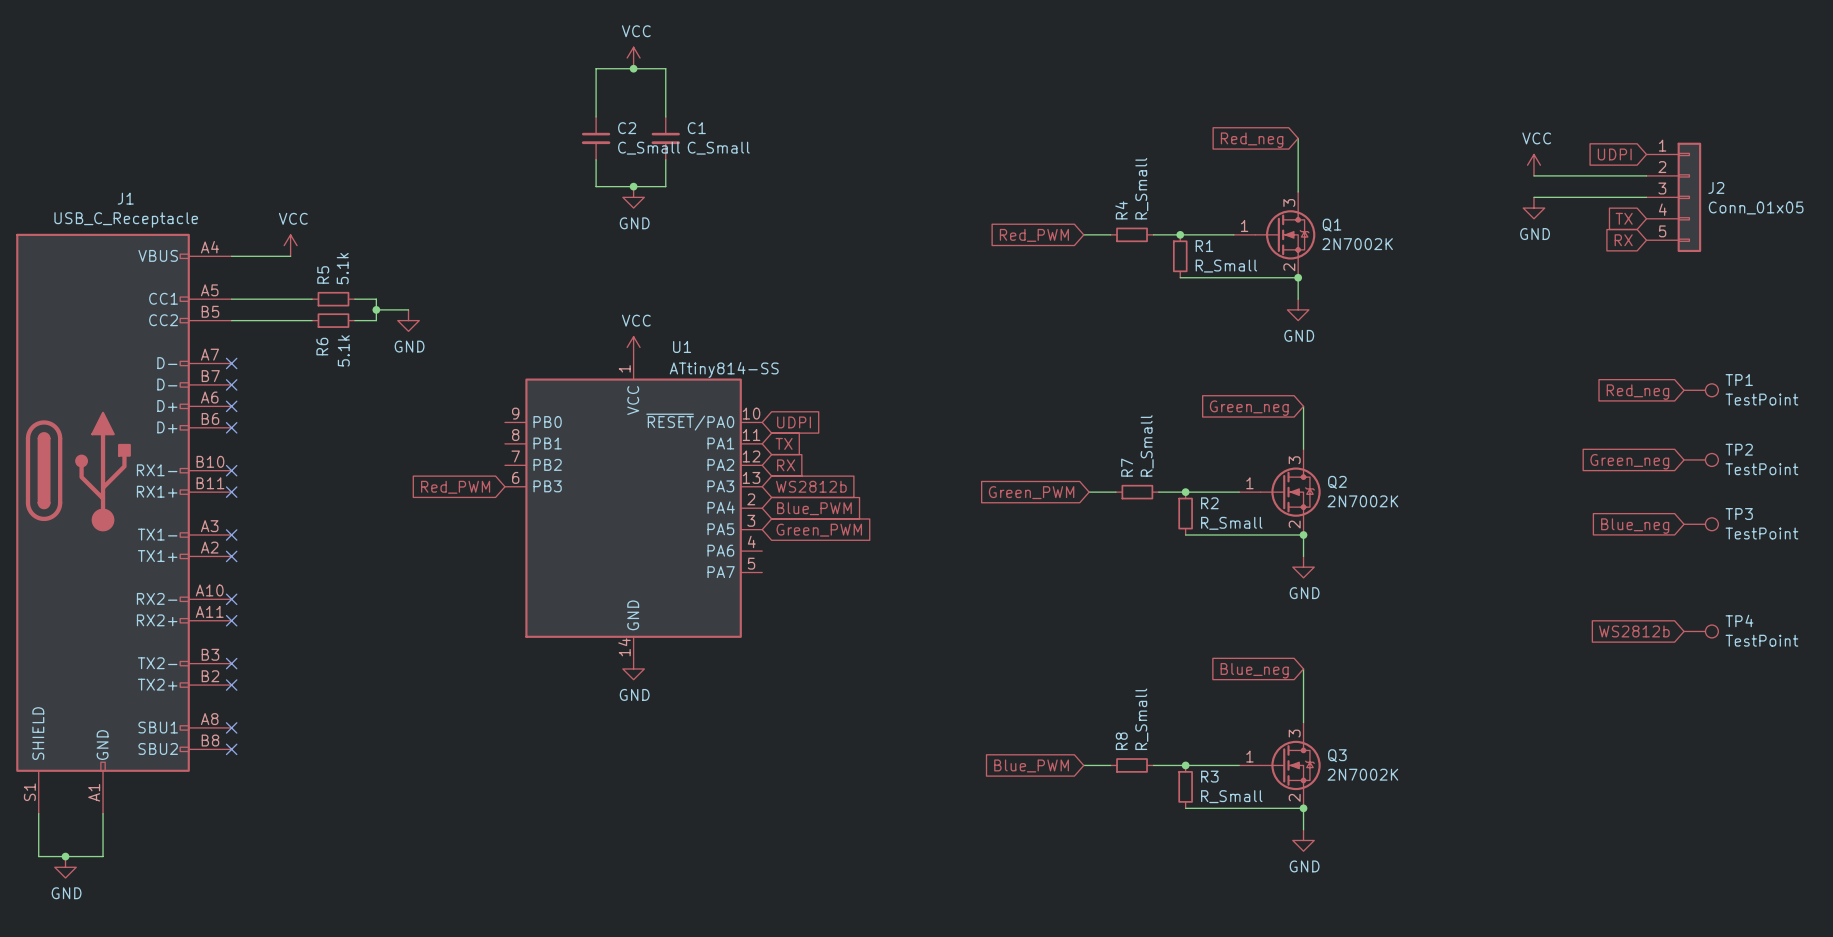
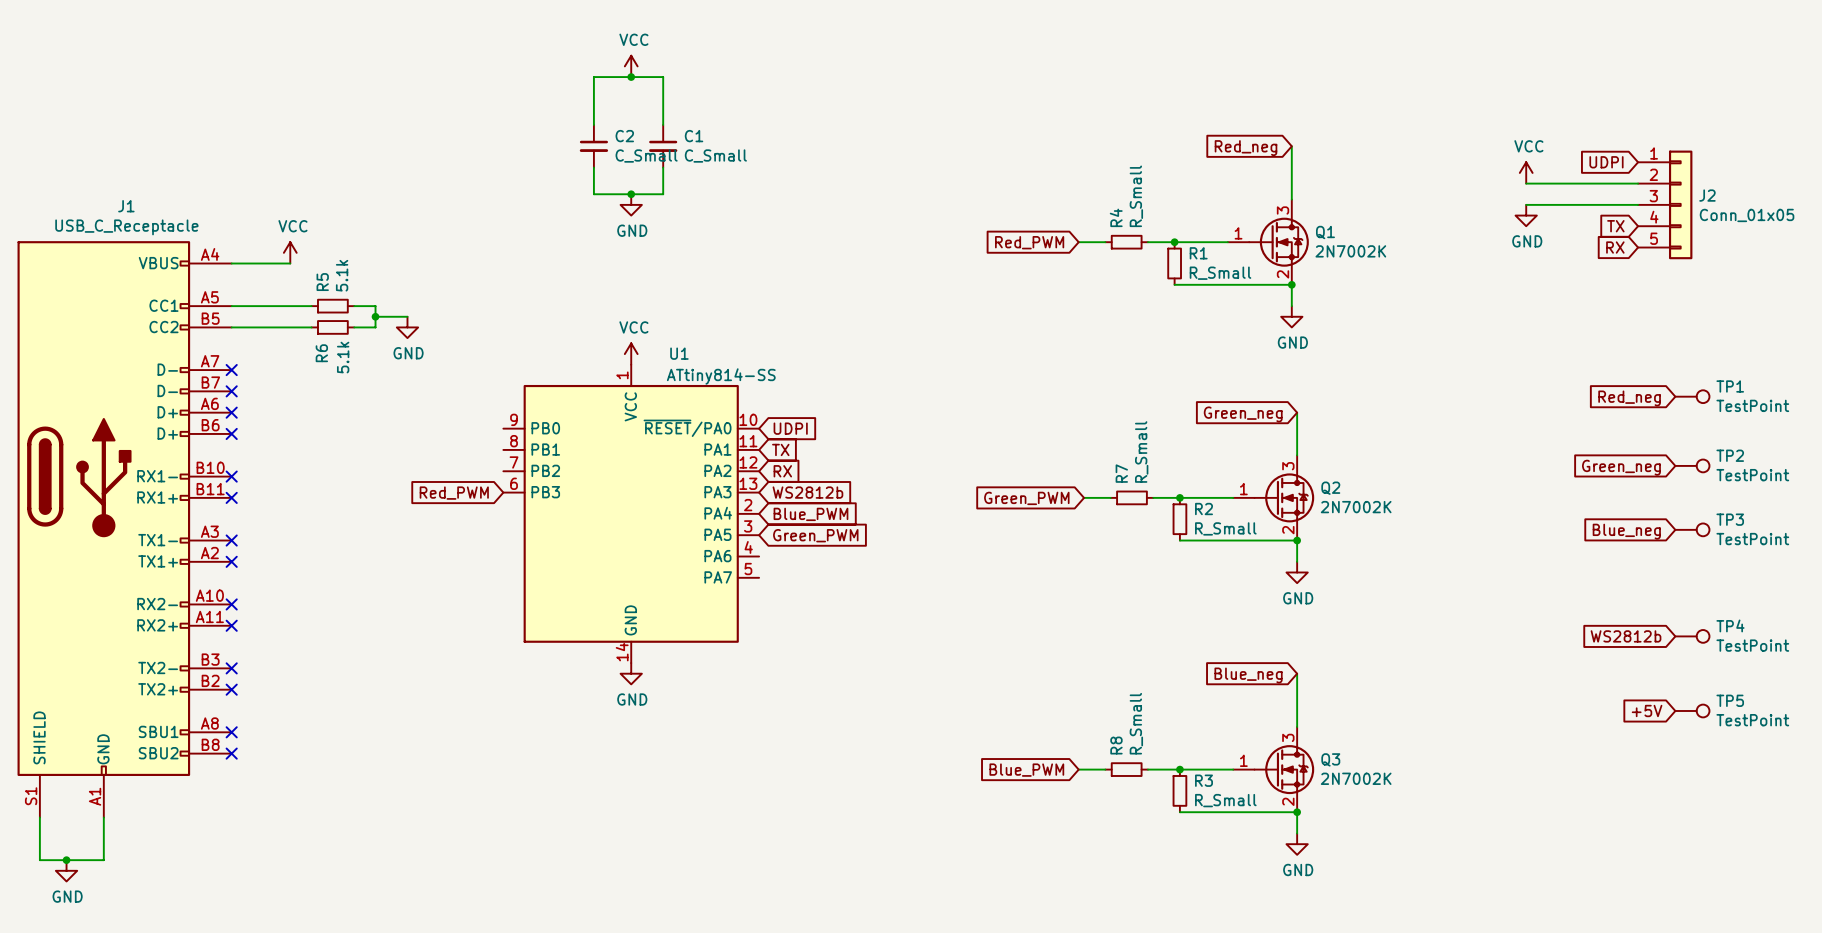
global label: none -> +5V (1647, 710)
TP5: none -> TestPoint (1692, 710)

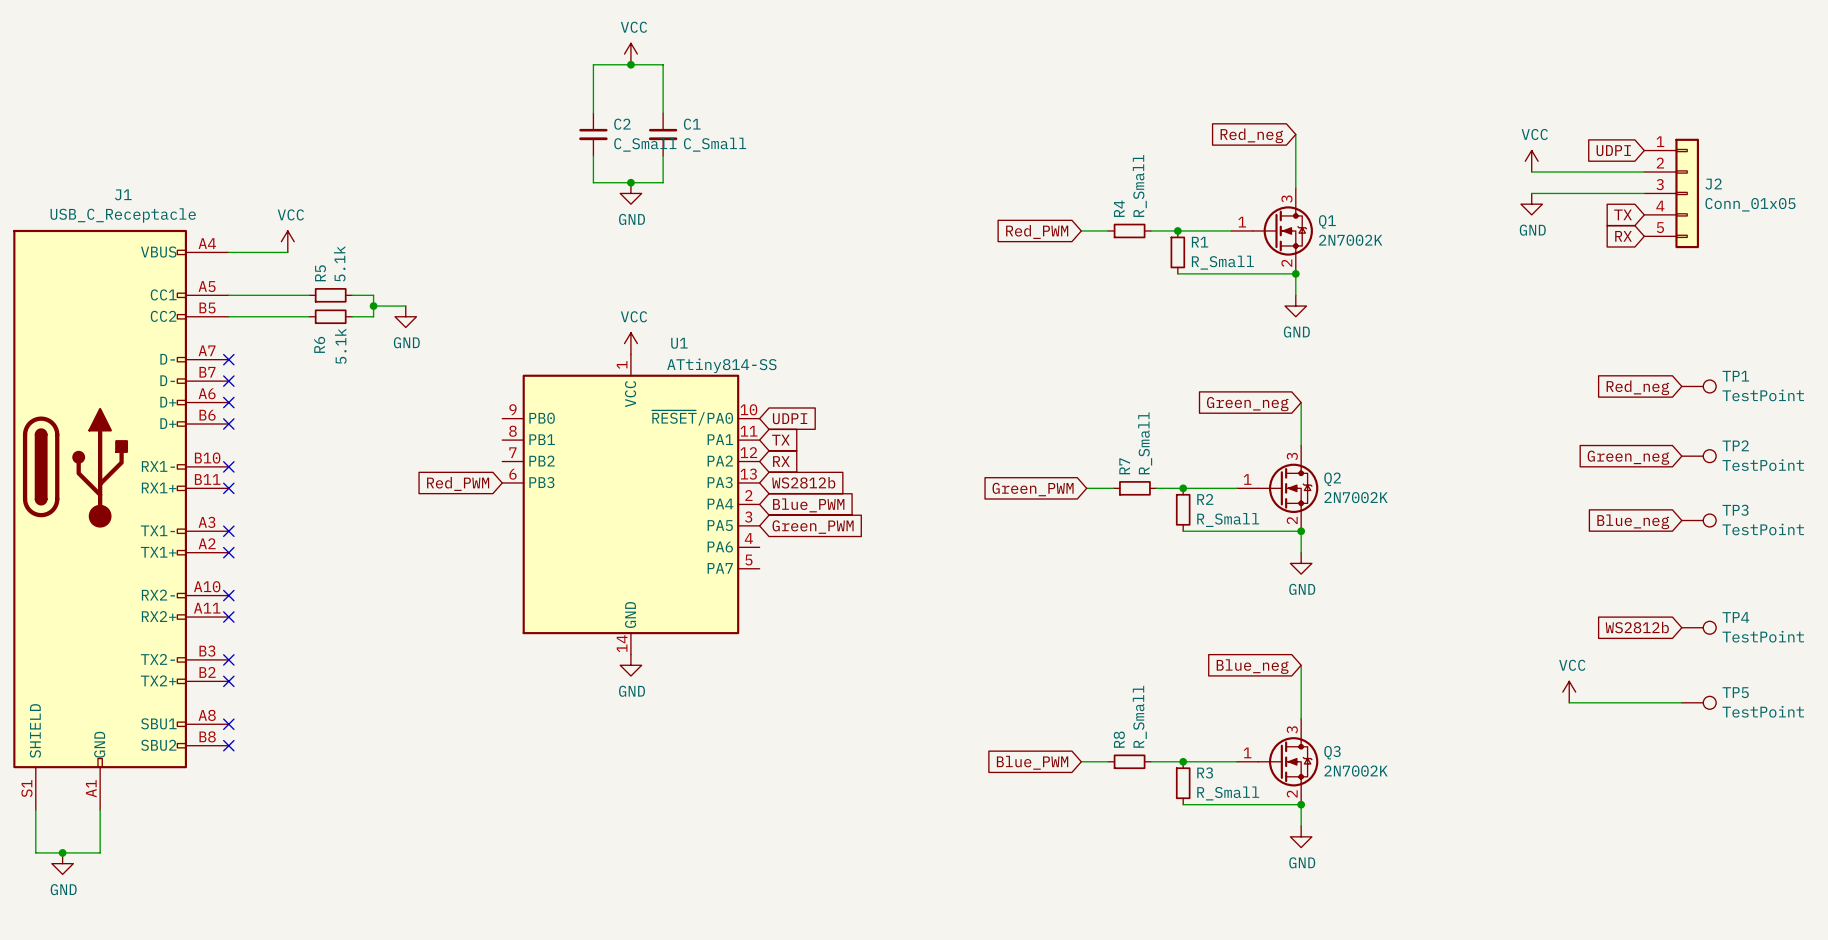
power symbol: none -> VCC (1569, 692)
wire: none -> (1569, 702) (1681, 702)
global label: +5V (1647, 710) -> none

